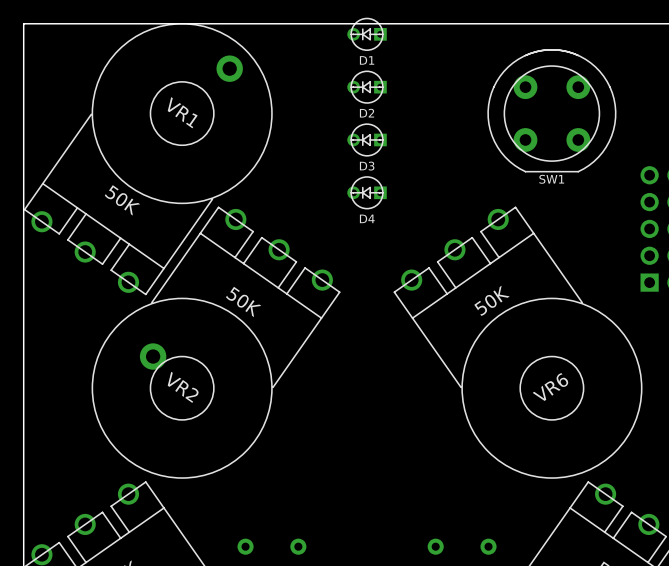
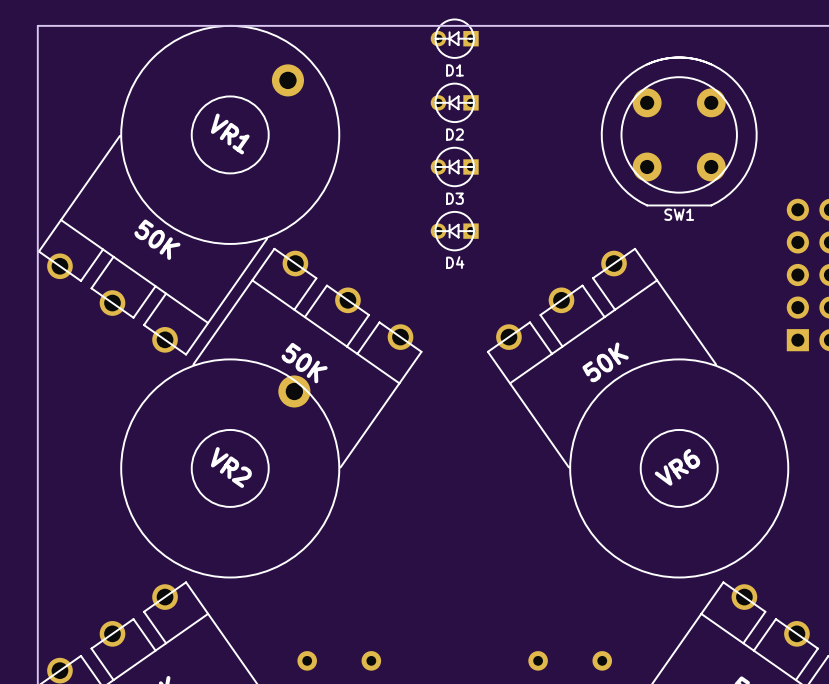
part position: (153, 356) -> (294, 391)

